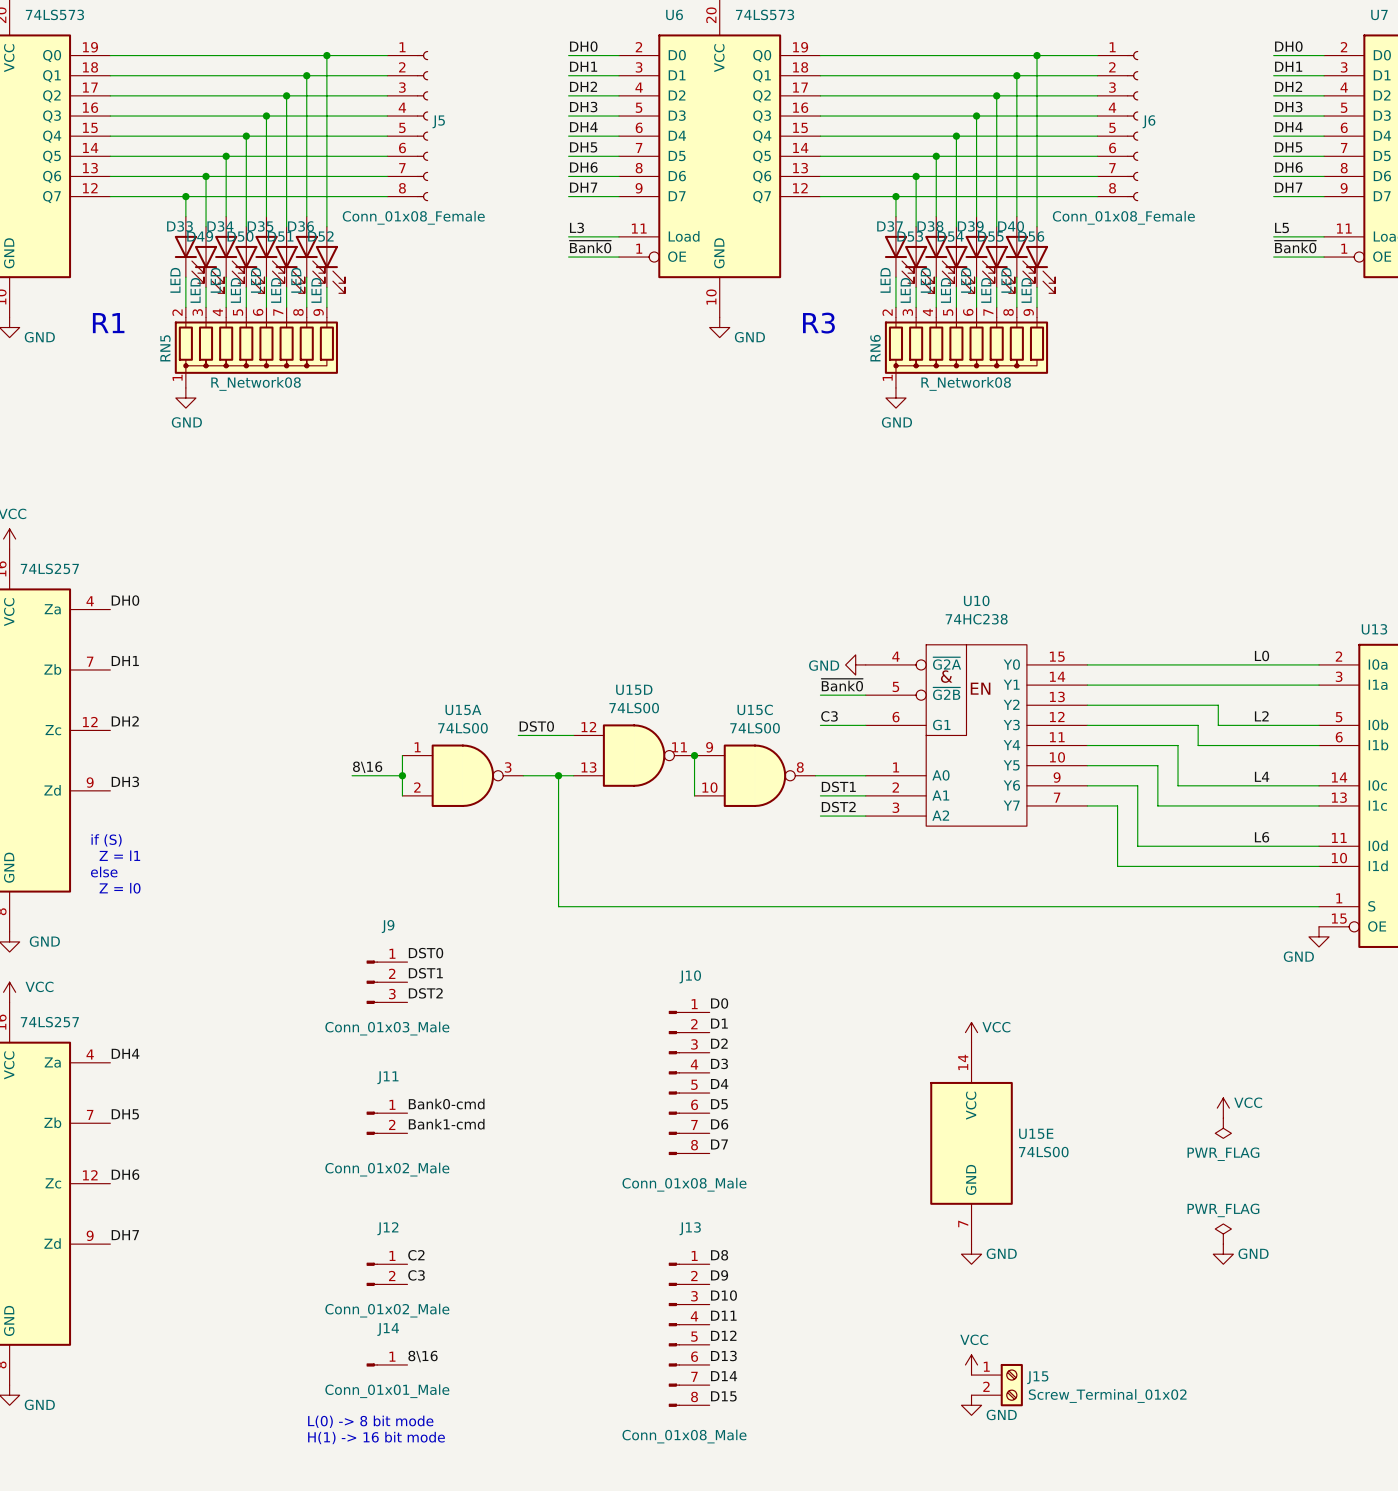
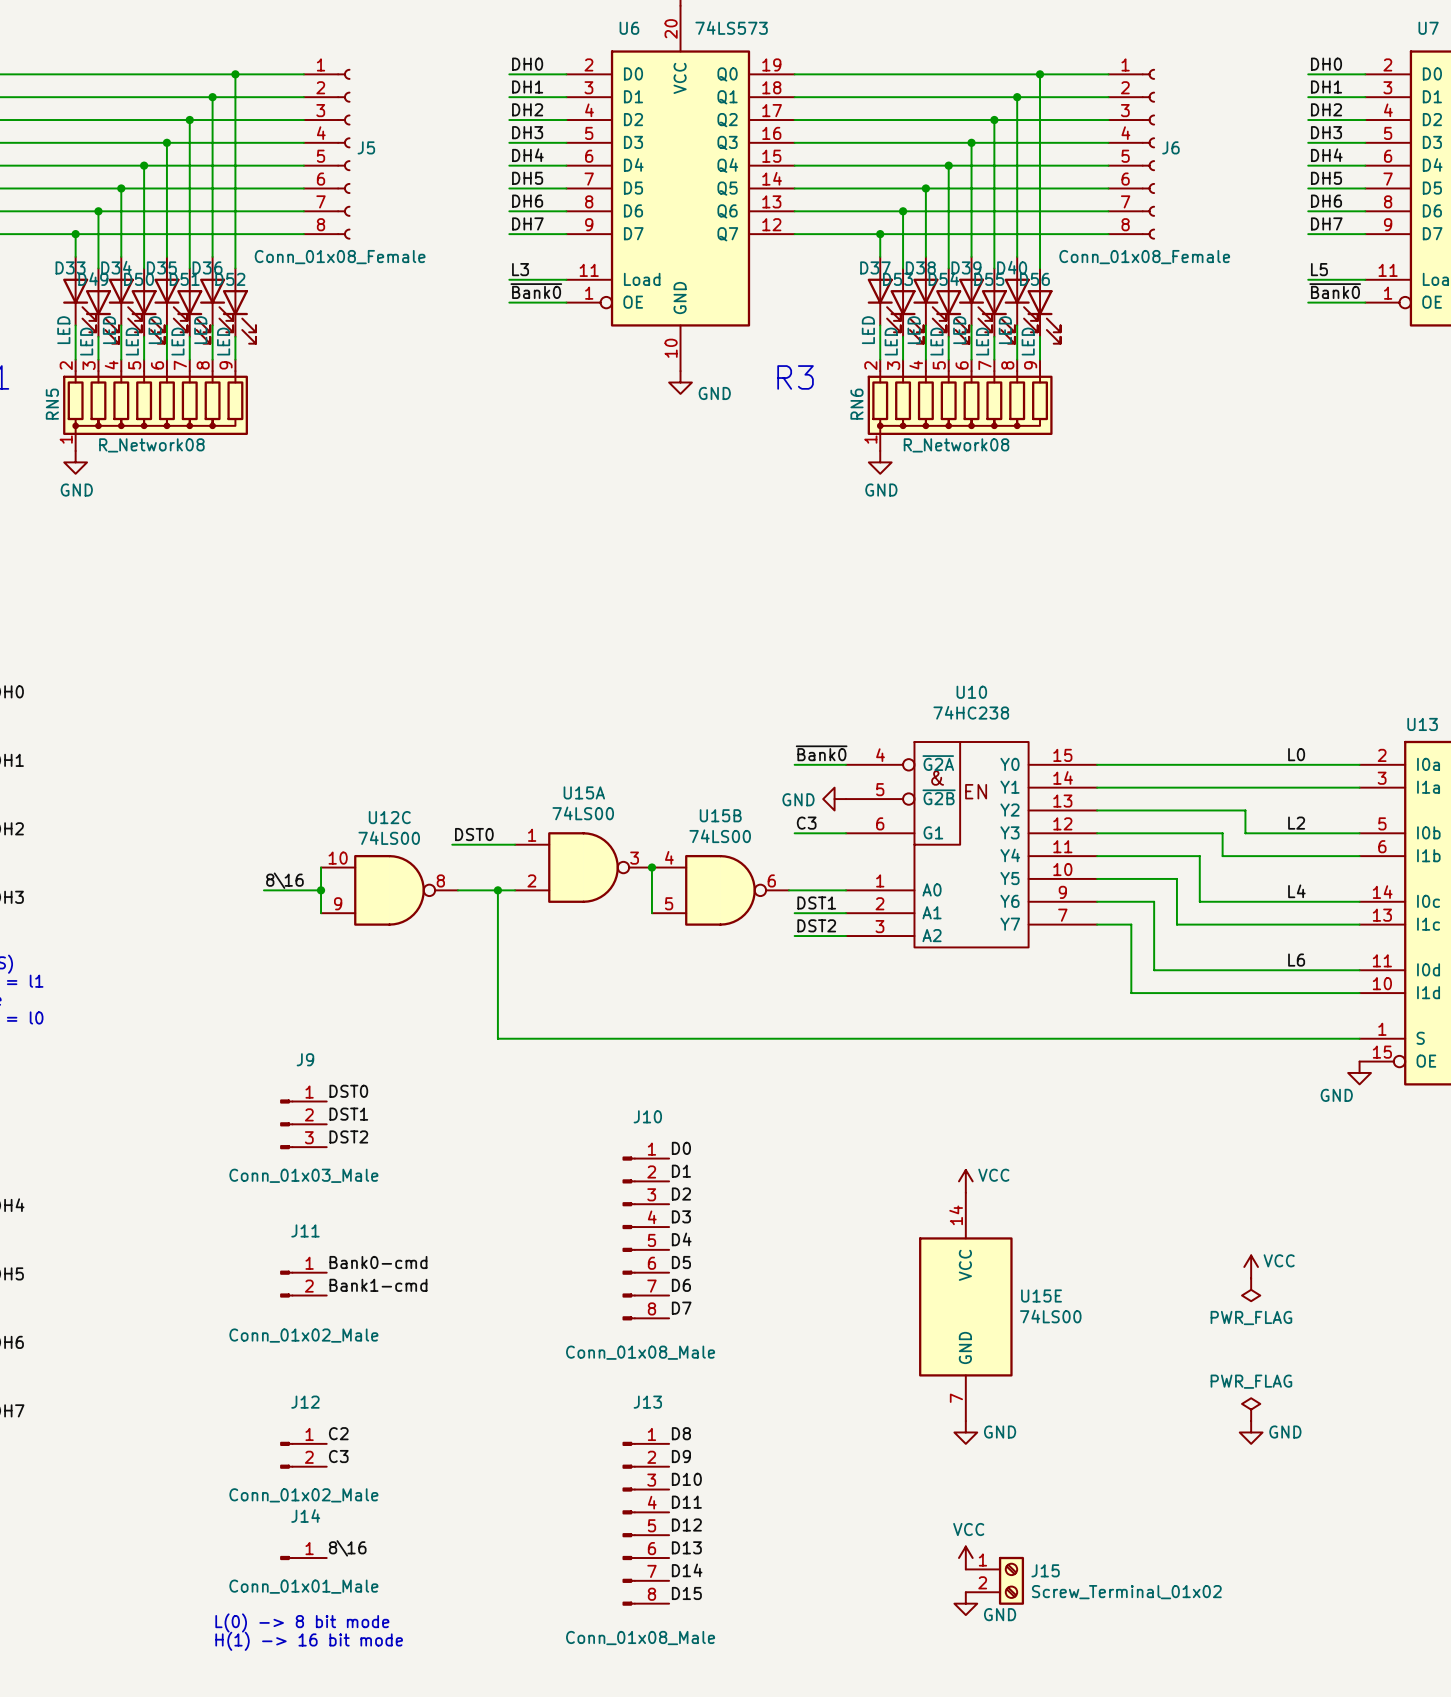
power symbol position: GND (855, 664) -> GND (834, 799)
label position: ~{Bank0} (842, 685) -> ~{Bank0} (821, 753)
wire: (820, 695) (865, 695) -> (794, 764) (846, 764)
U15C name: U15C (755, 709) -> U15B (720, 815)
U15C pin number: 9 (709, 747) -> 4 (669, 857)
U15D: 74LS00 (634, 755) -> none
U15C pin number: 8 (800, 767) -> 6 (771, 880)
U15A position: (462, 775) -> (583, 867)
U12C: none -> 74LS00 (389, 890)
U15C pin number: 10 (709, 787) -> 5 (669, 903)

